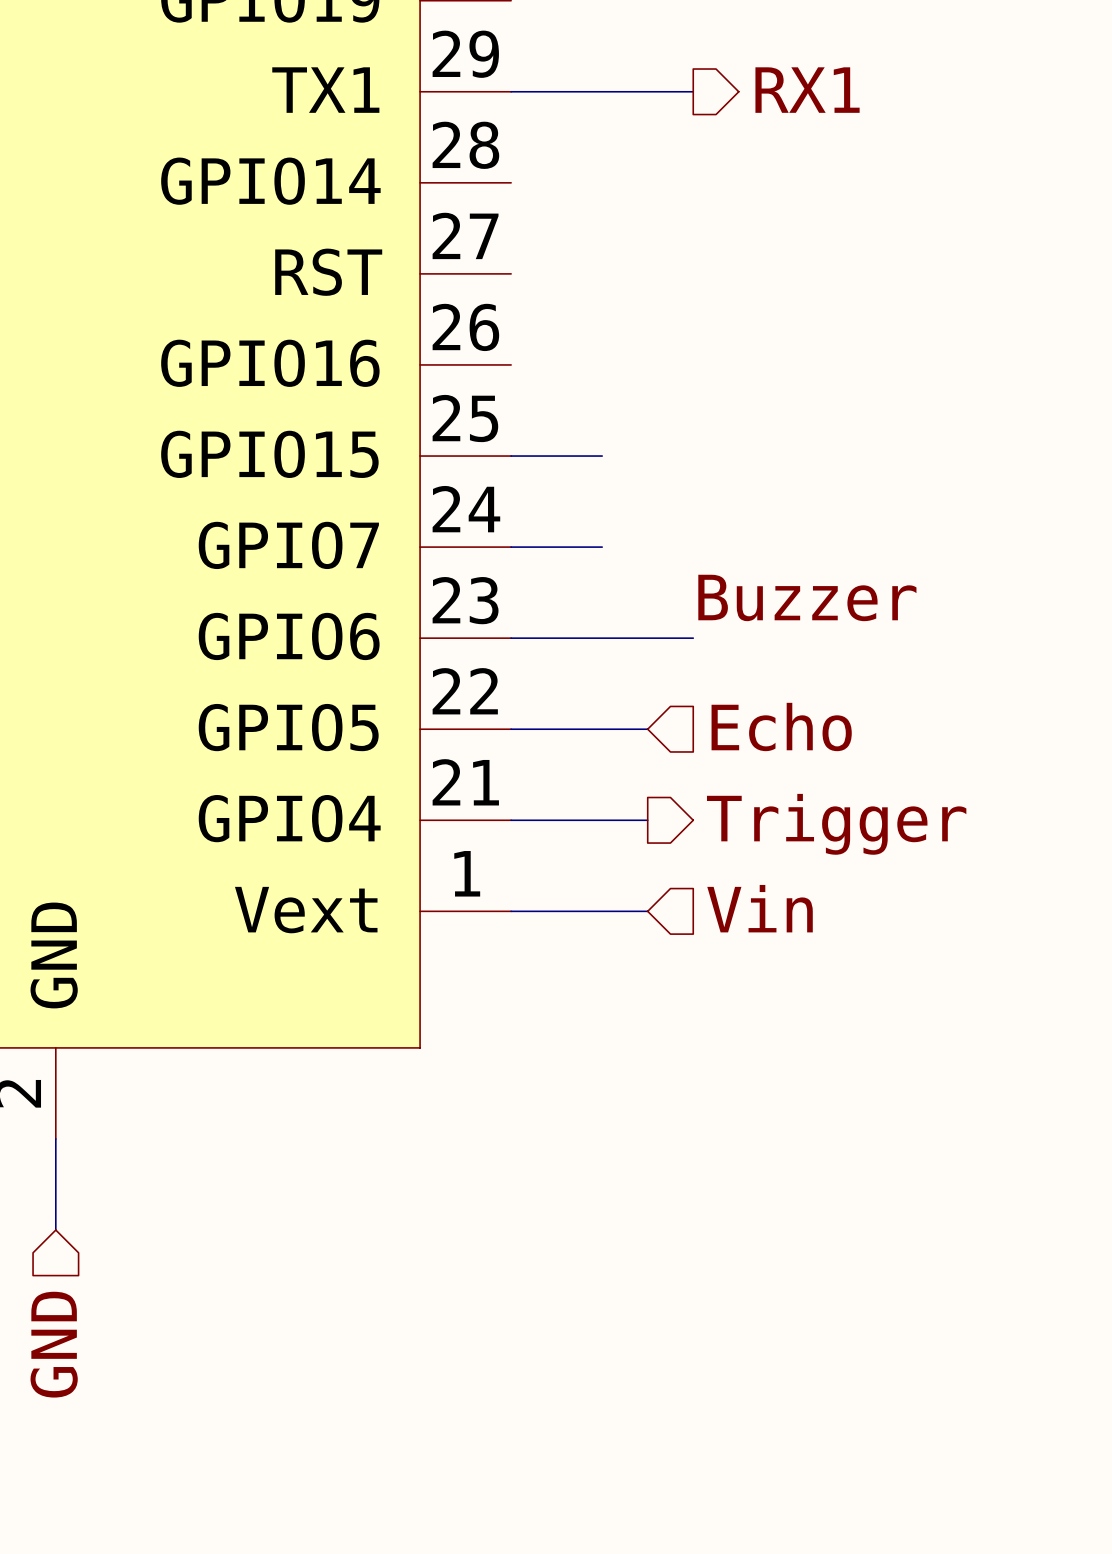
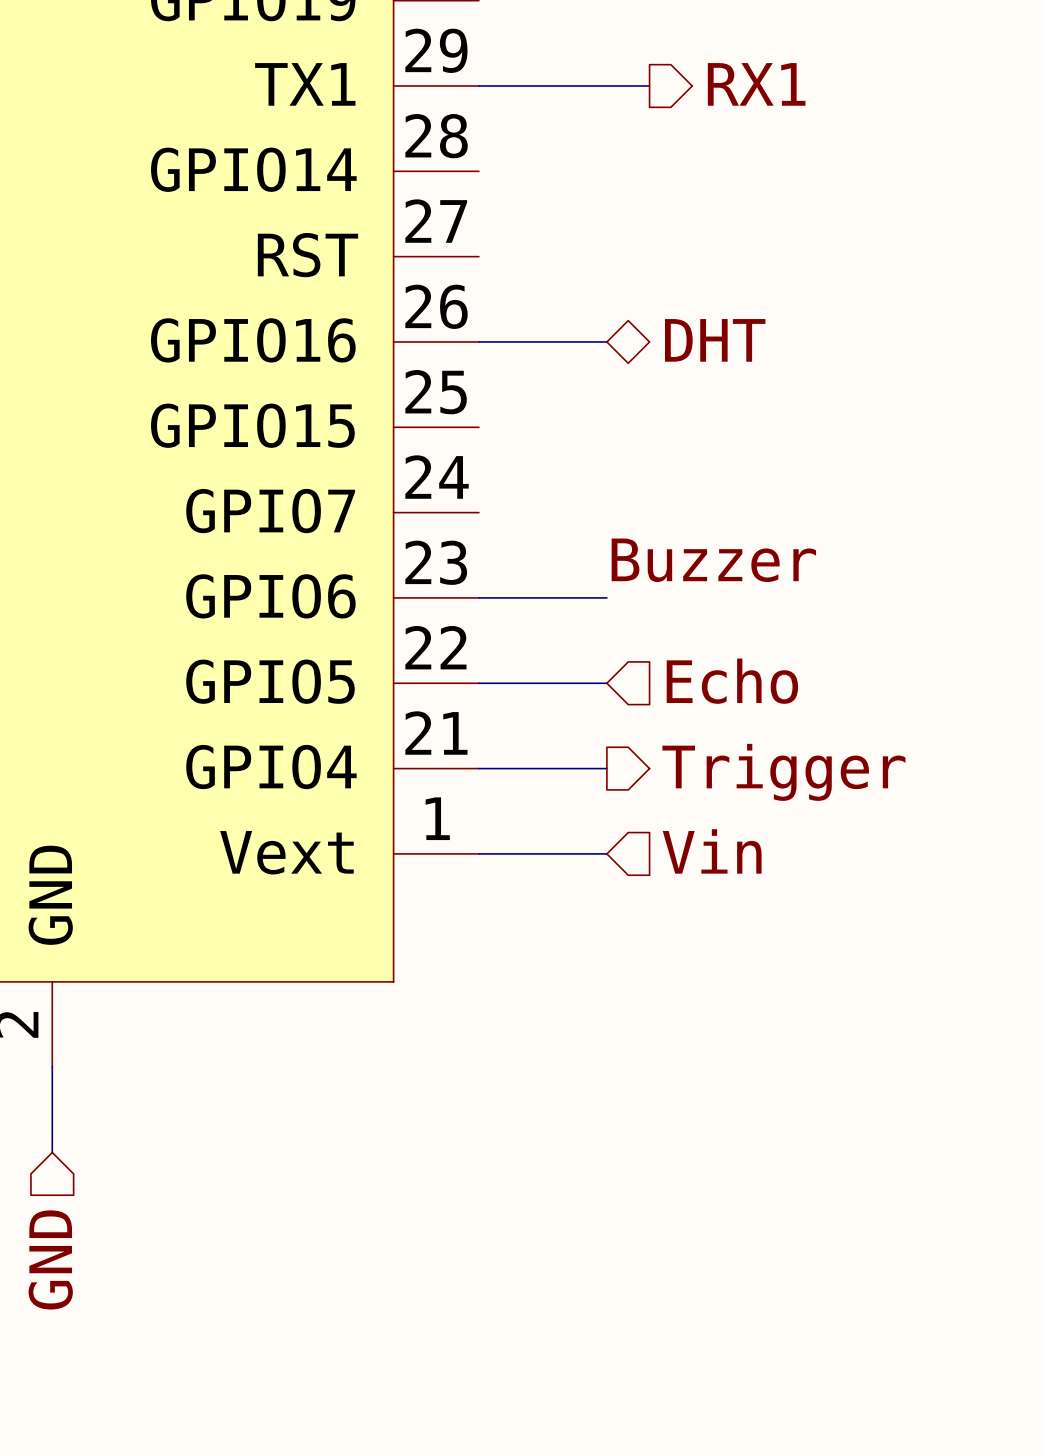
hierarchical label: none -> DHT (715, 340)
wire: none -> (478, 341) (606, 341)
wire: (511, 456) (602, 456) -> none
wire: (511, 547) (602, 547) -> none
label position: Buzzer (807, 597) -> Buzzer (713, 560)
wire: (647, 638) (693, 638) -> none

